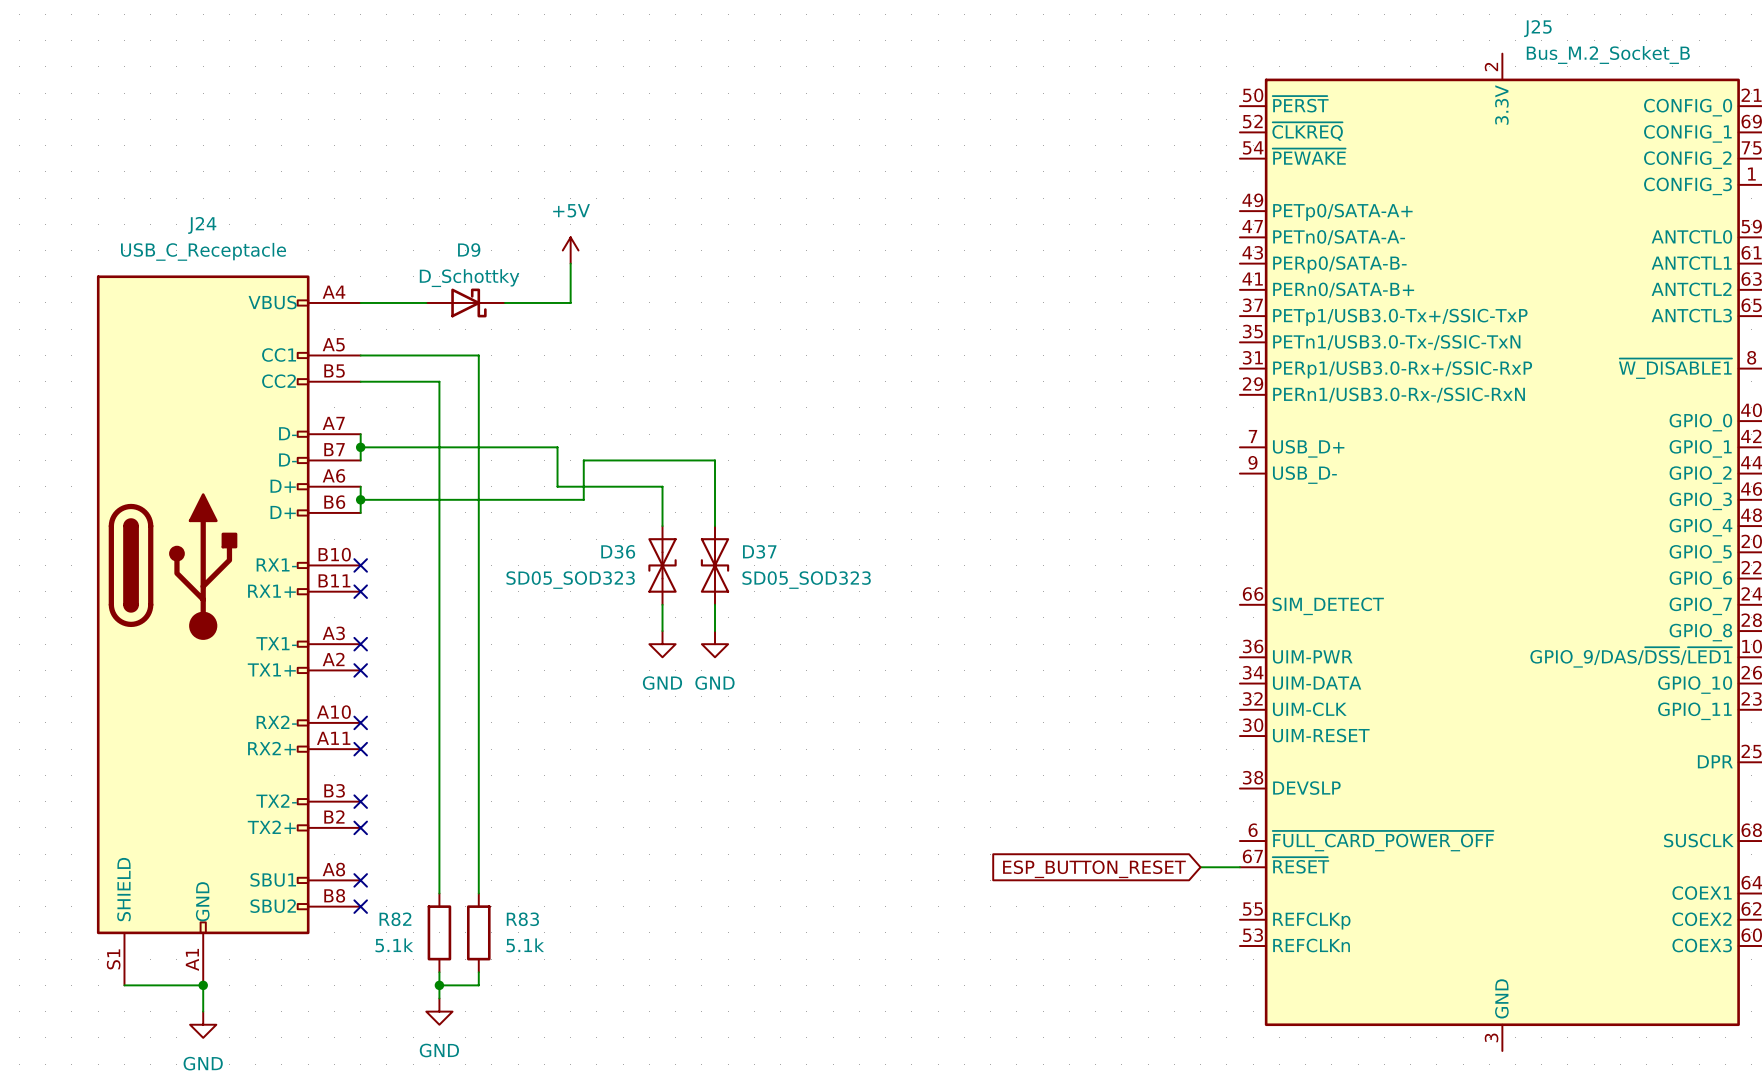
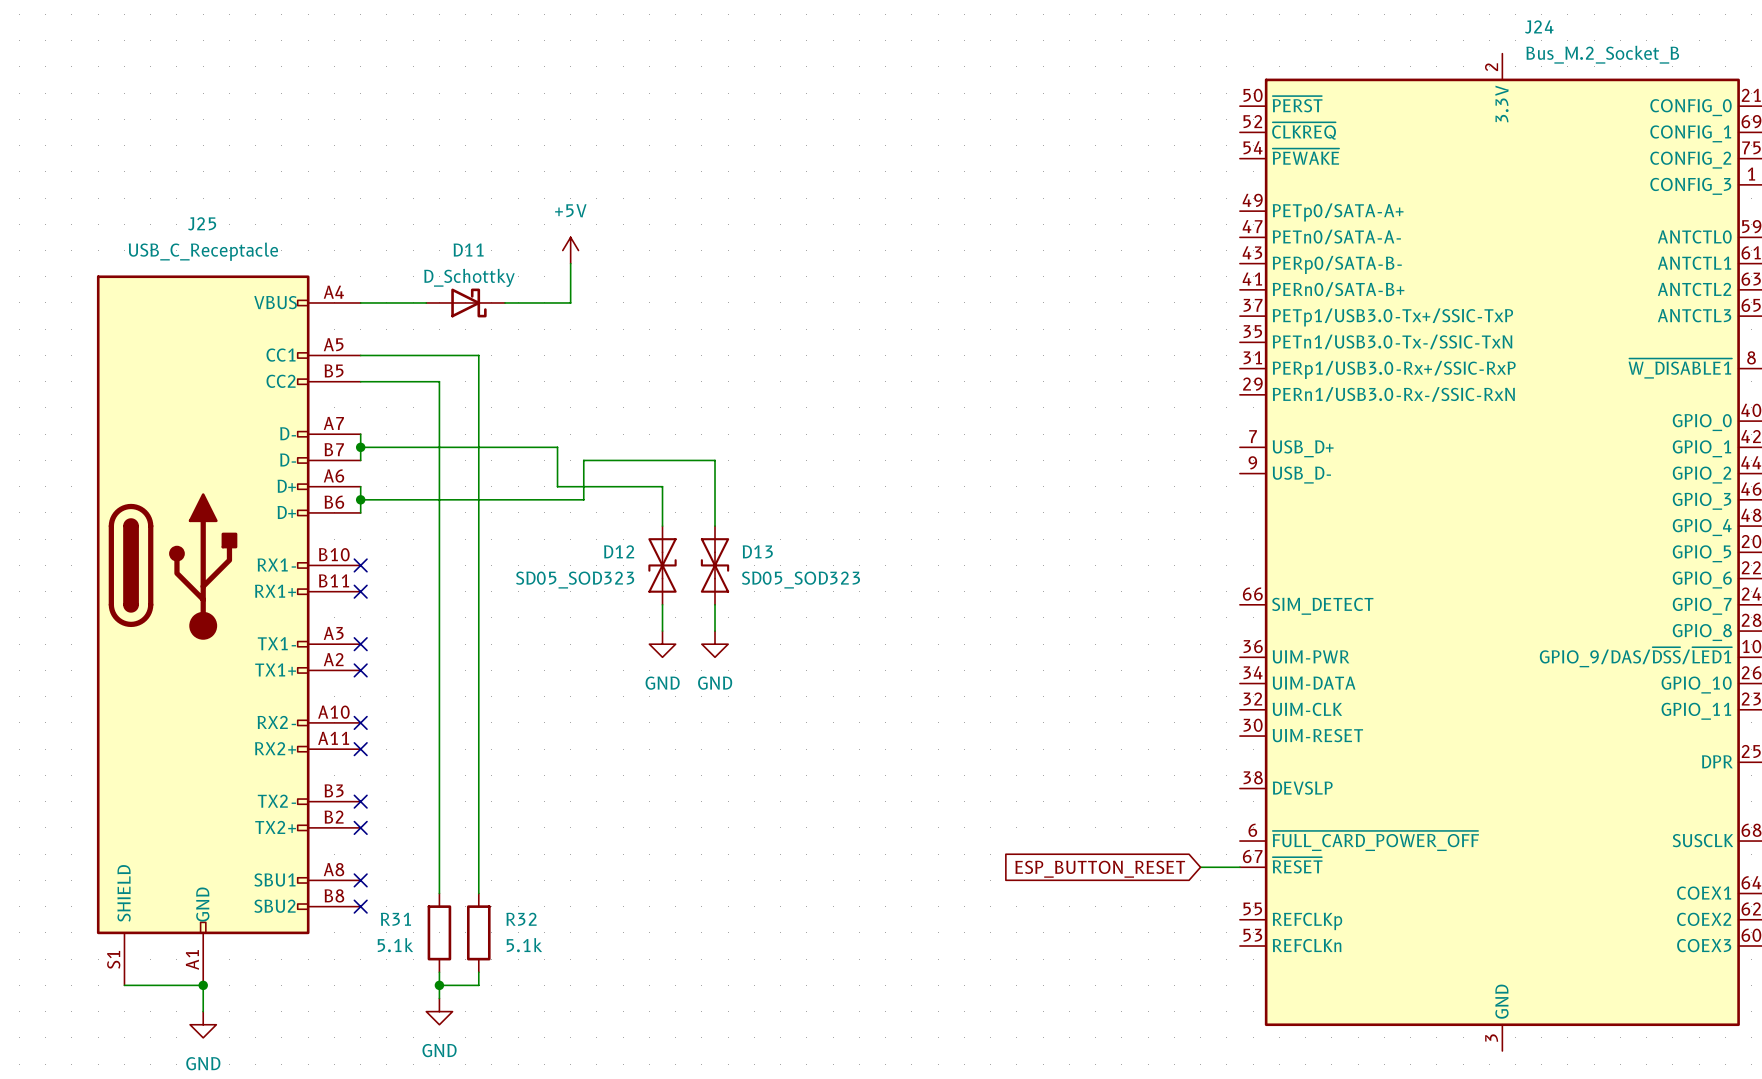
J25 name: J25 (1537, 28) -> J24 (1539, 26)
J24 name: J24 (202, 225) -> J25 (202, 223)
D9 name: D9 (469, 250) -> D11 (468, 250)
D36 name: D36 (618, 551) -> D12 (619, 551)
D37 name: D37 (759, 551) -> D13 (757, 551)
R82 name: R82 (395, 919) -> R31 (395, 919)
R83 name: R83 (522, 919) -> R32 (521, 919)

